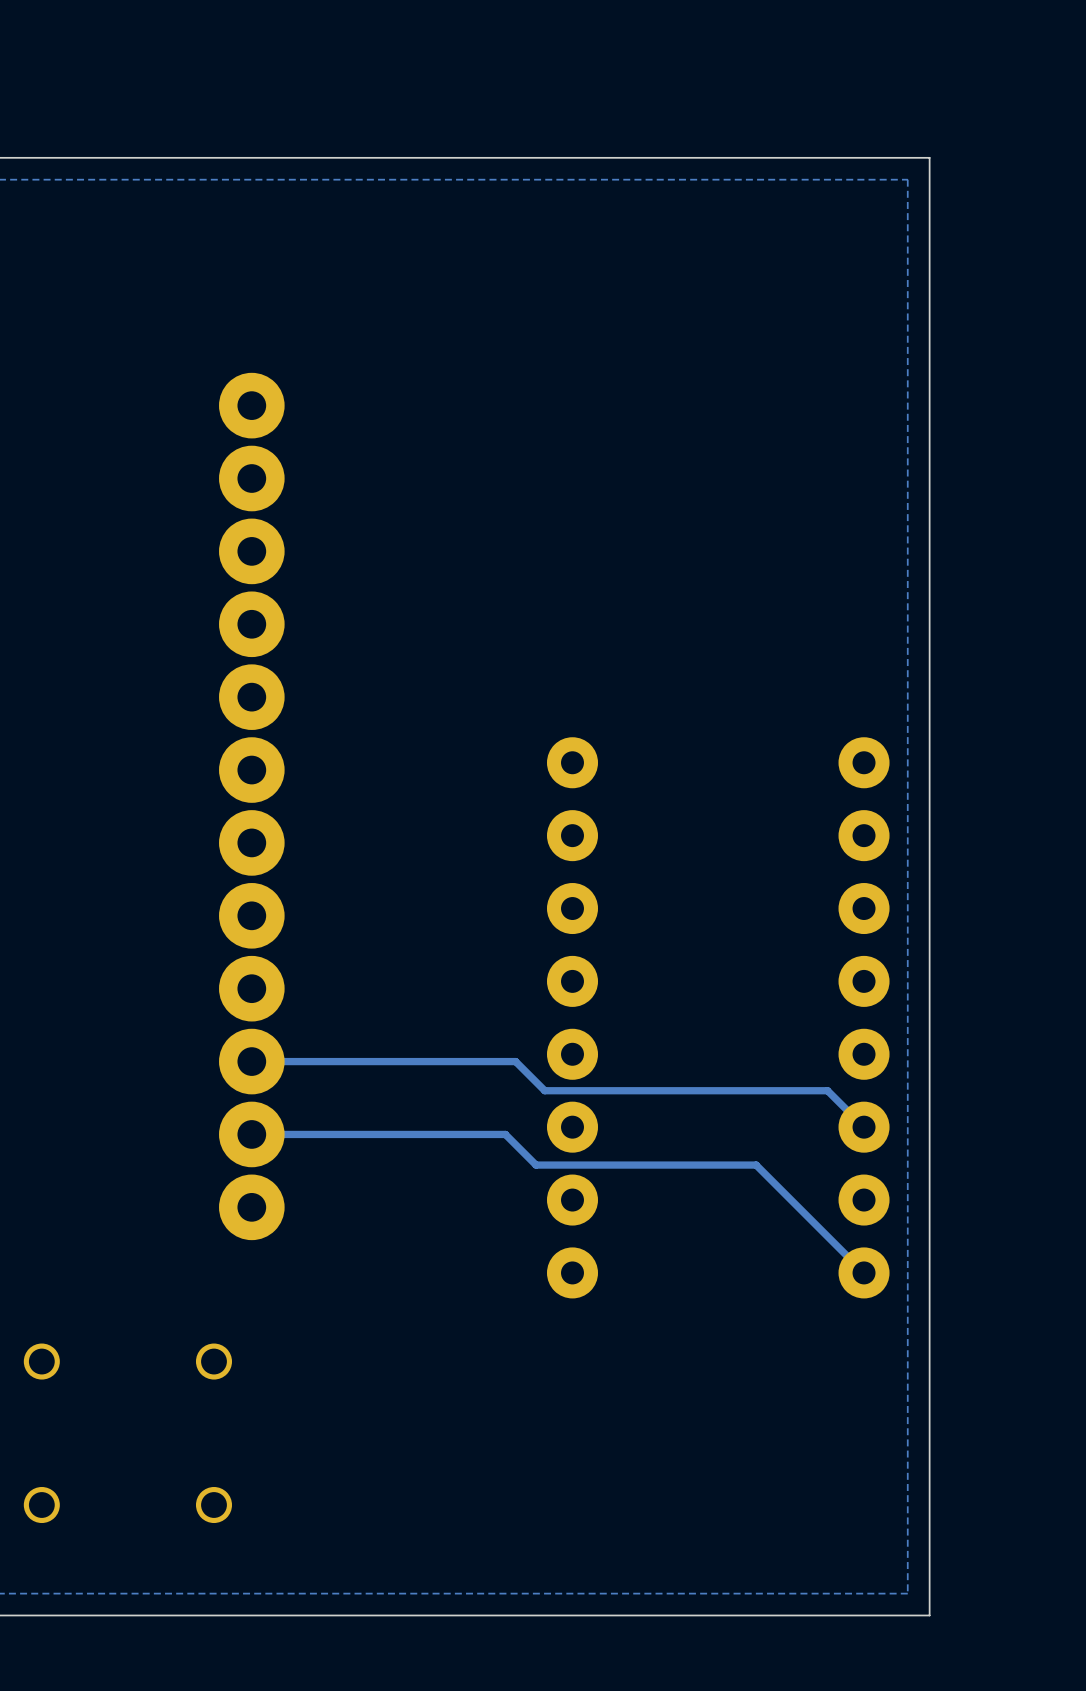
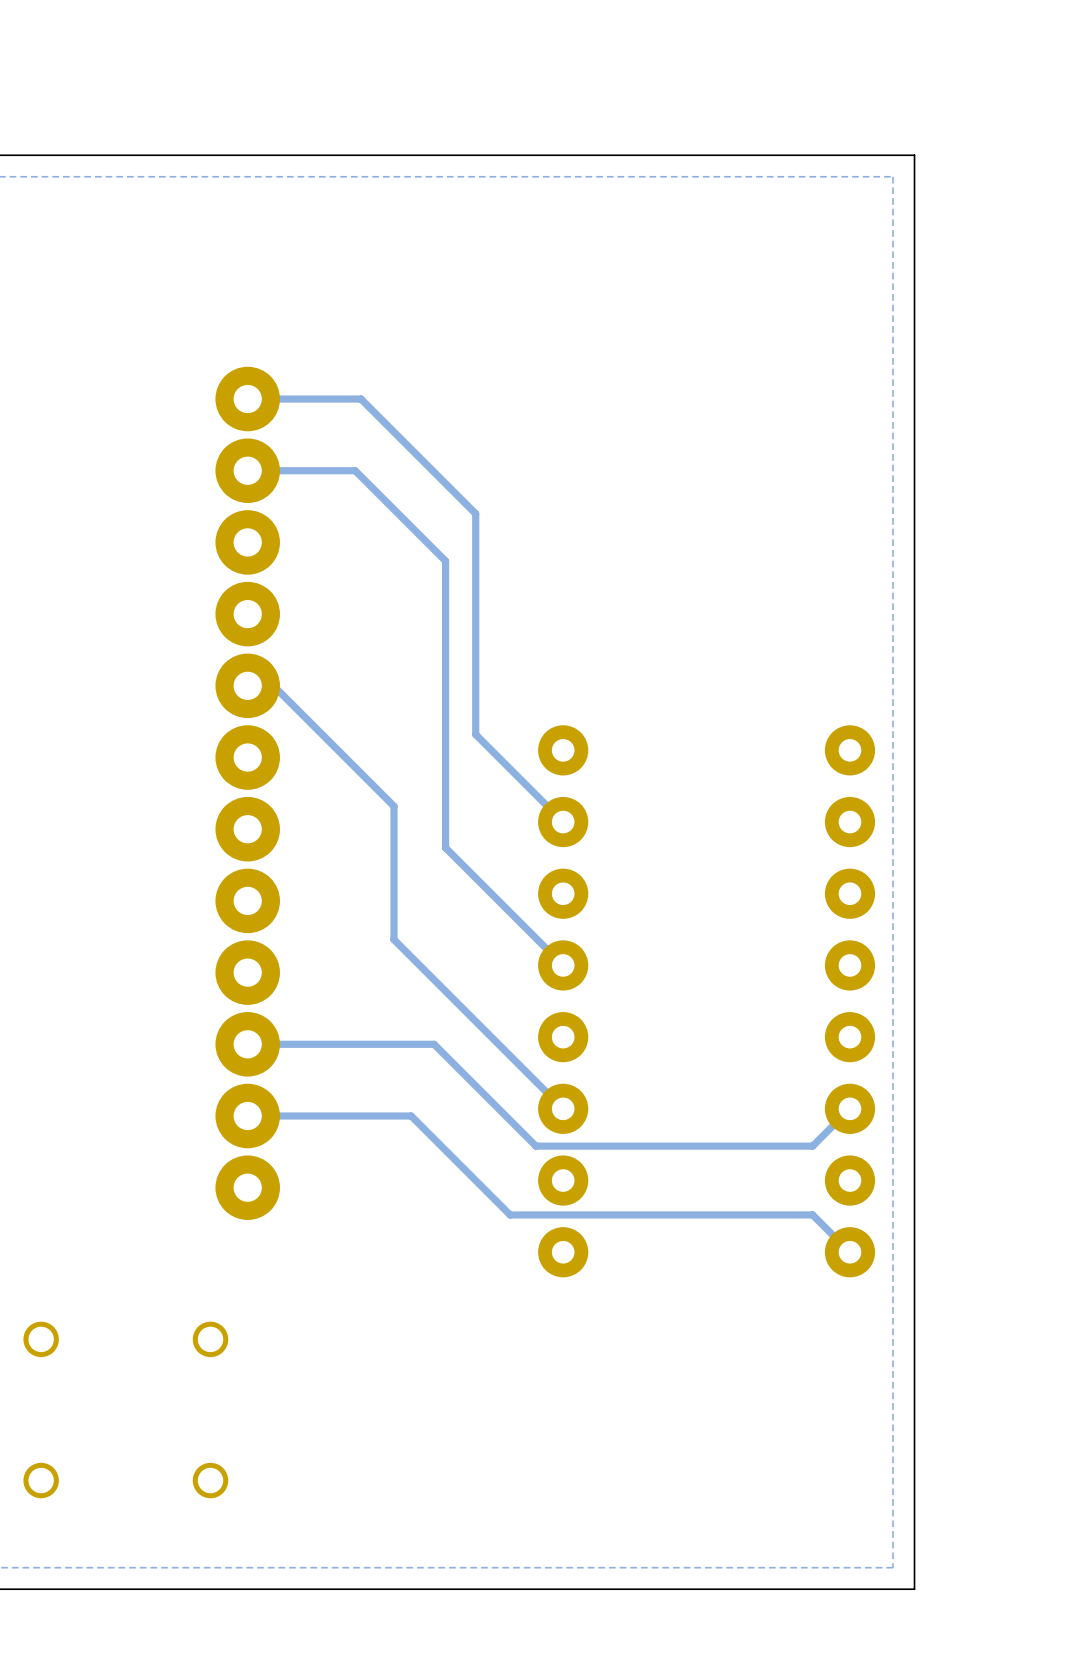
track: none -> (247, 399) (361, 399) (475, 513) (475, 734) (563, 822)
track: none -> (247, 470) (355, 470) (445, 561) (445, 847) (563, 965)
track: none -> (247, 685) (273, 685) (393, 806) (393, 939) (563, 1108)
track: (441, 1061) (515, 1061) (544, 1090) (827, 1090) (864, 1127) -> none
track: (417, 1134) (505, 1134) (536, 1165) (544, 1165) -> (434, 1044) (535, 1146)
track: none -> (411, 1116) (510, 1214) (812, 1214)
track: (756, 1165) (826, 1235) -> (743, 1146) (812, 1146) (849, 1108)

